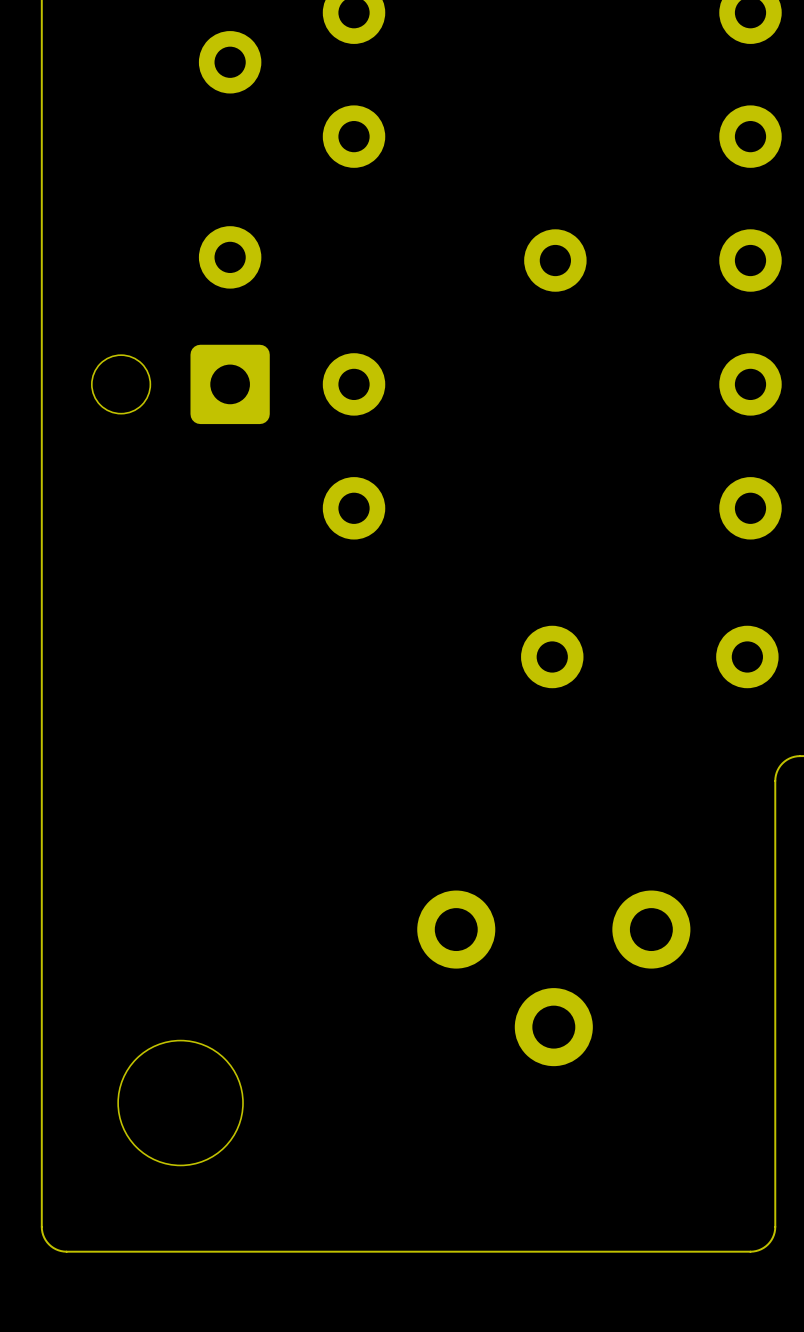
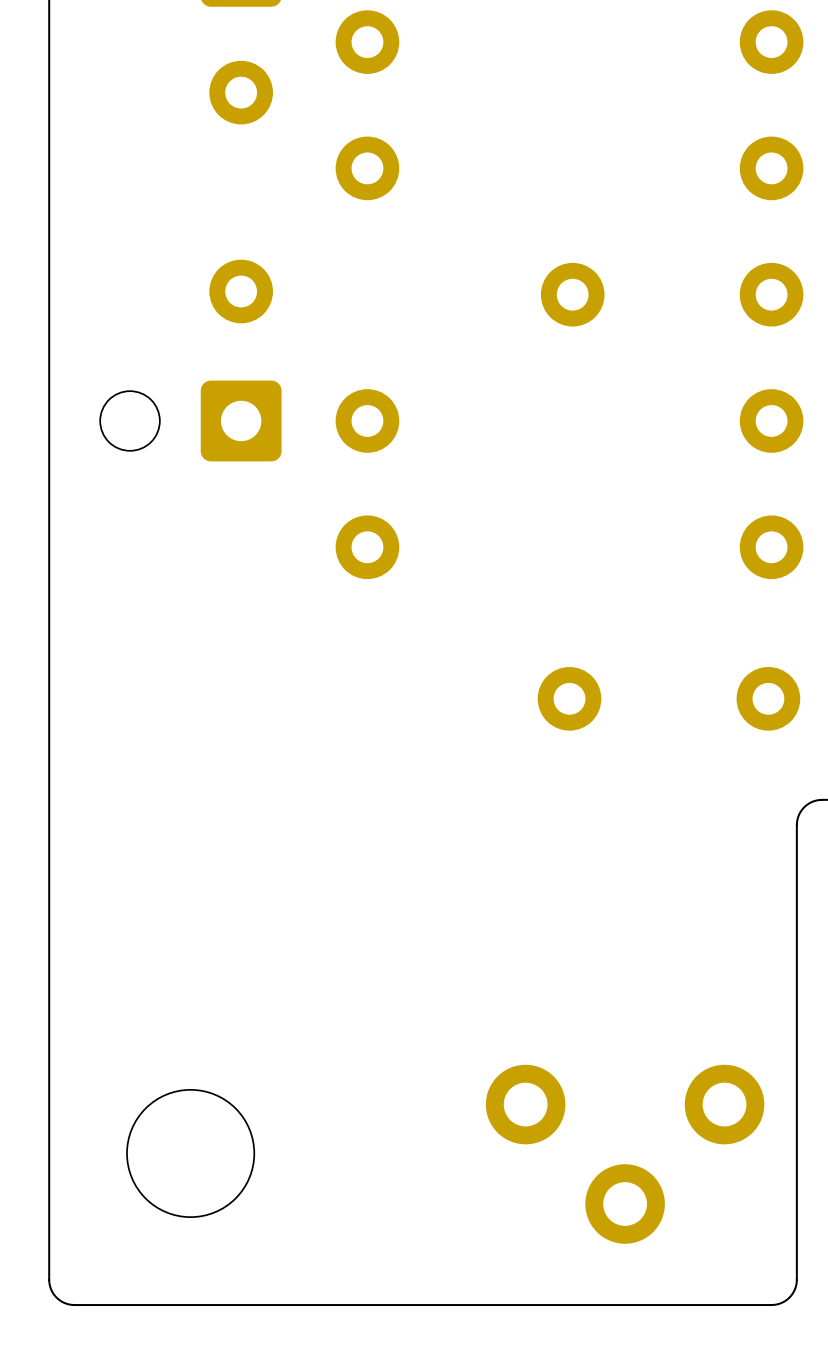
part position: (553, 978) -> (625, 1154)

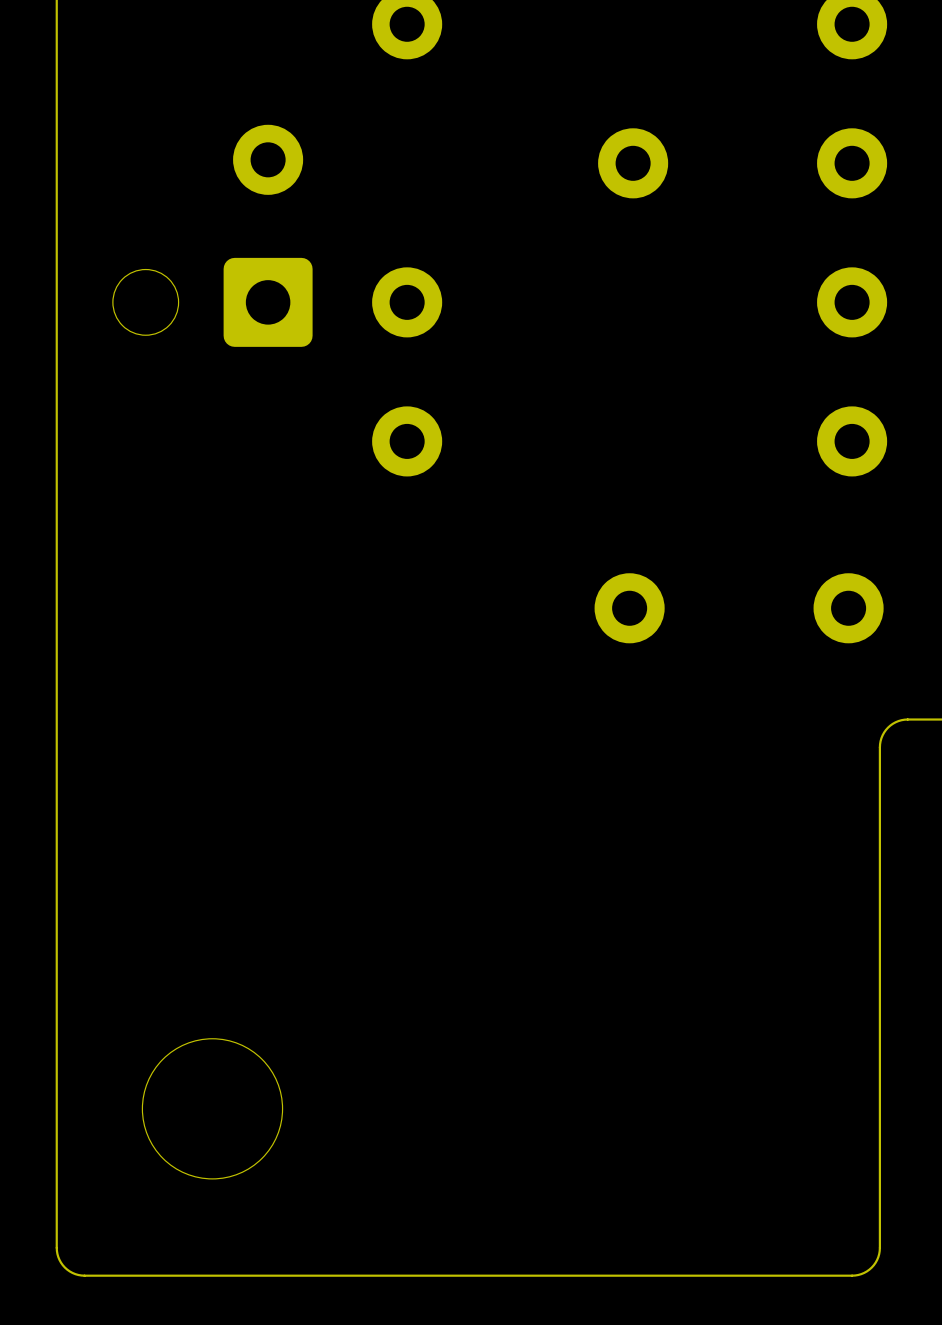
part: (625, 1154) -> none

